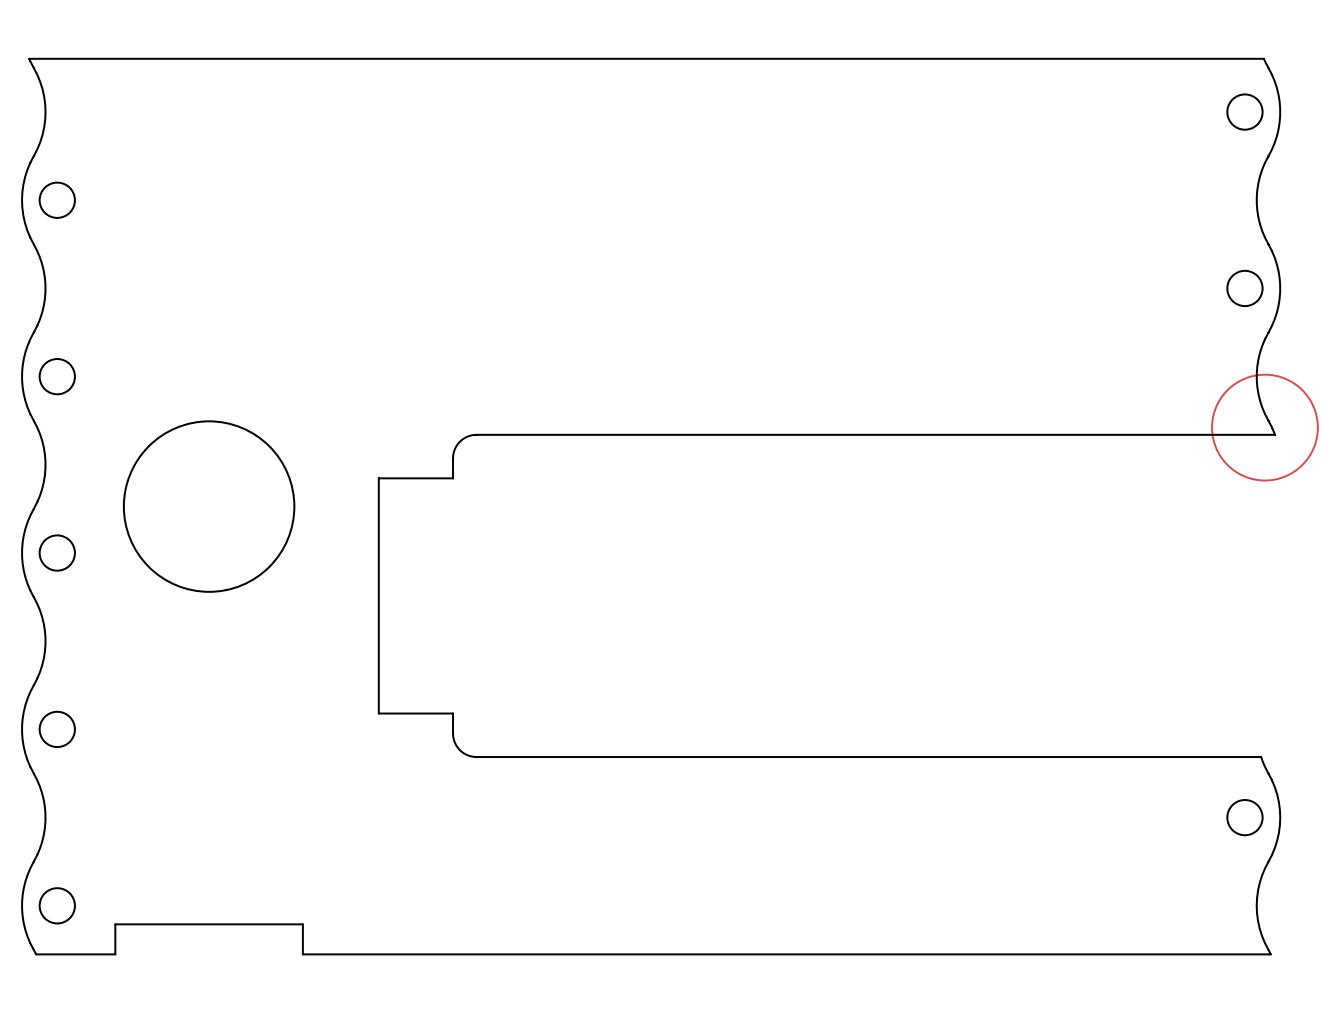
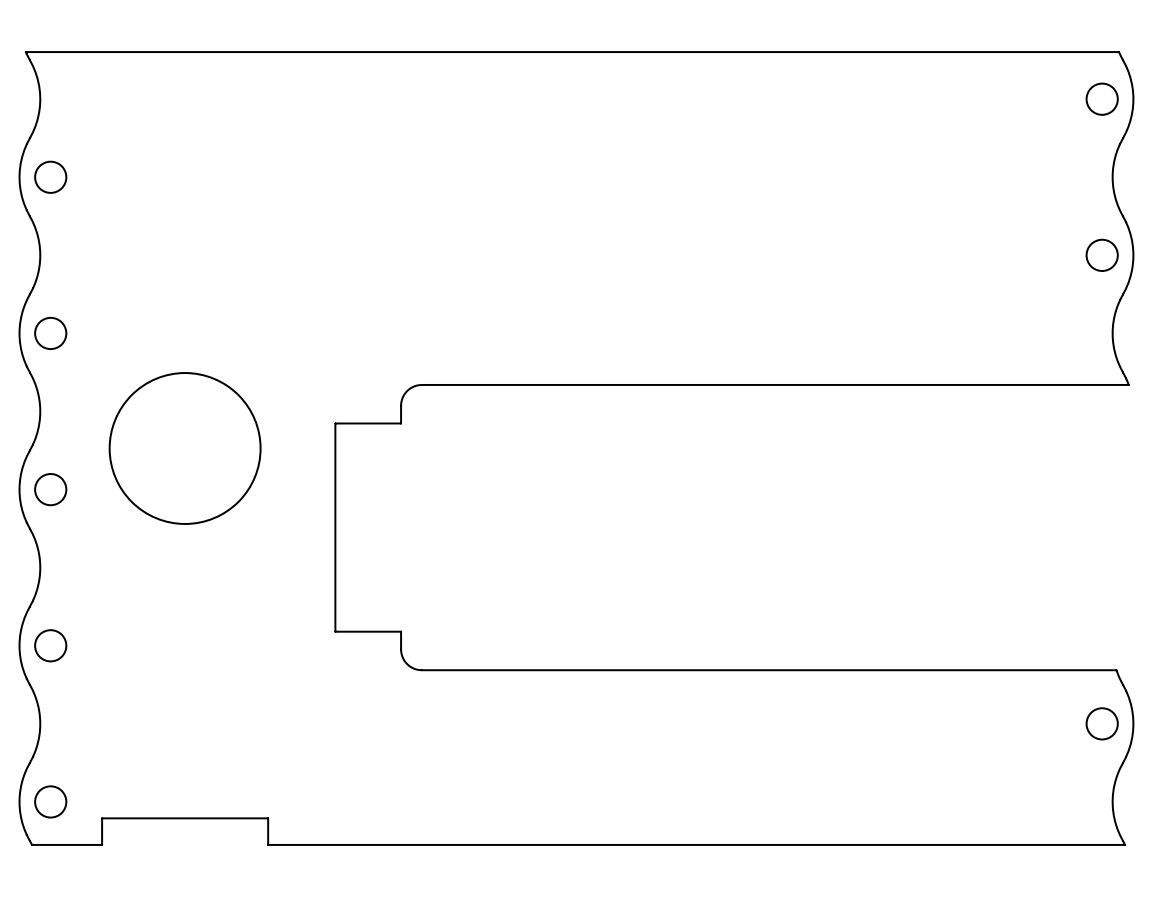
drawing: [1211, 373, 1319, 482] -> none

